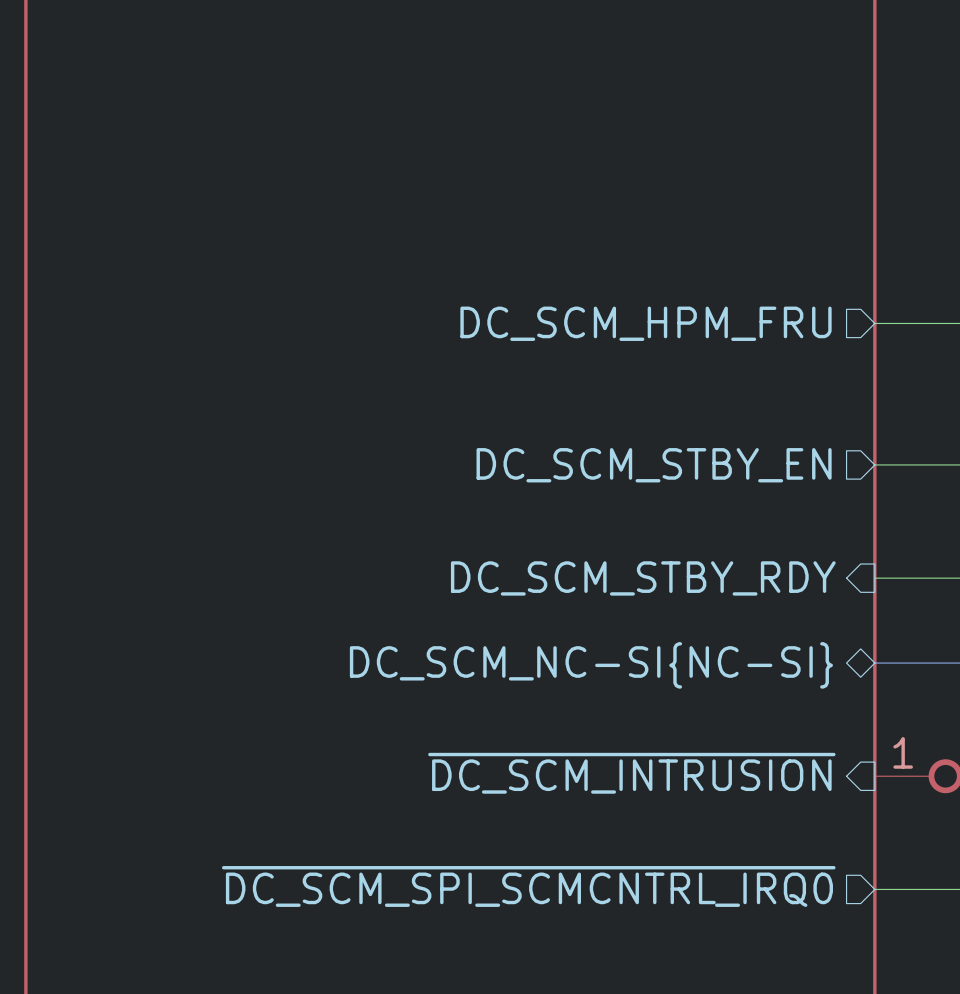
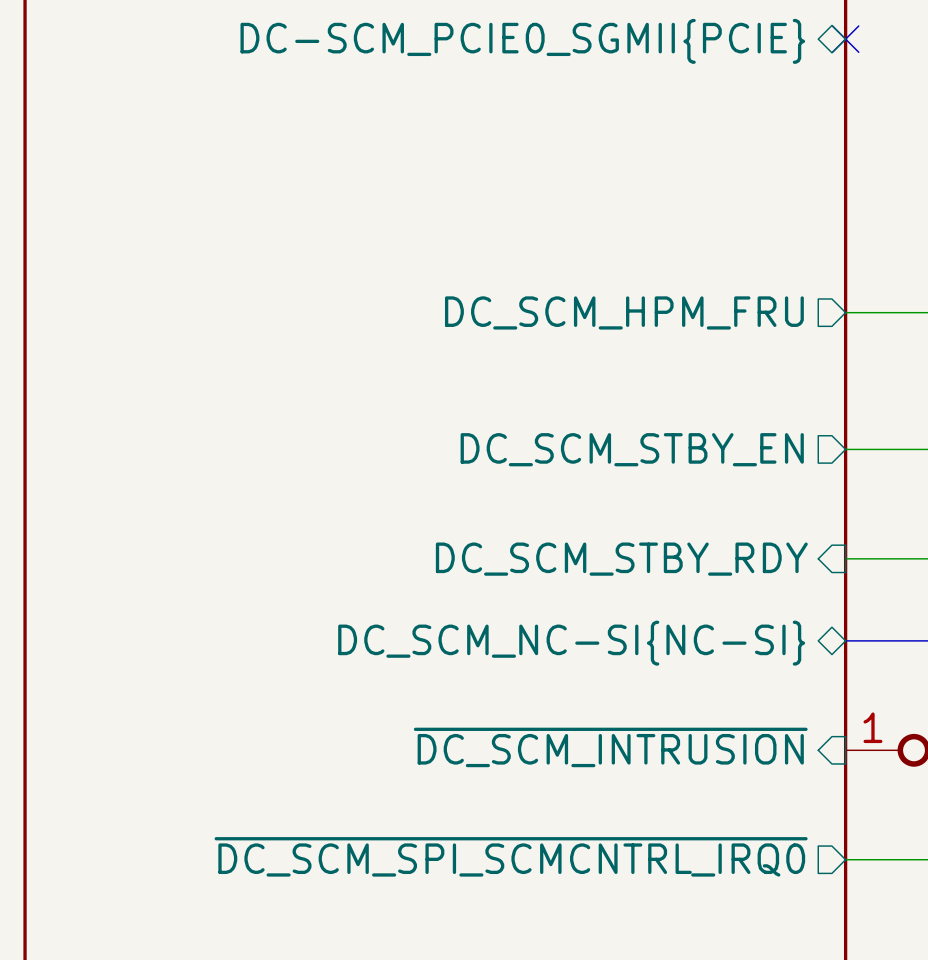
no-connect mark: none -> (845, 39)
sheet pin: none -> DC-SCM_PCIE0_SGMII{PCIE} (522, 41)

